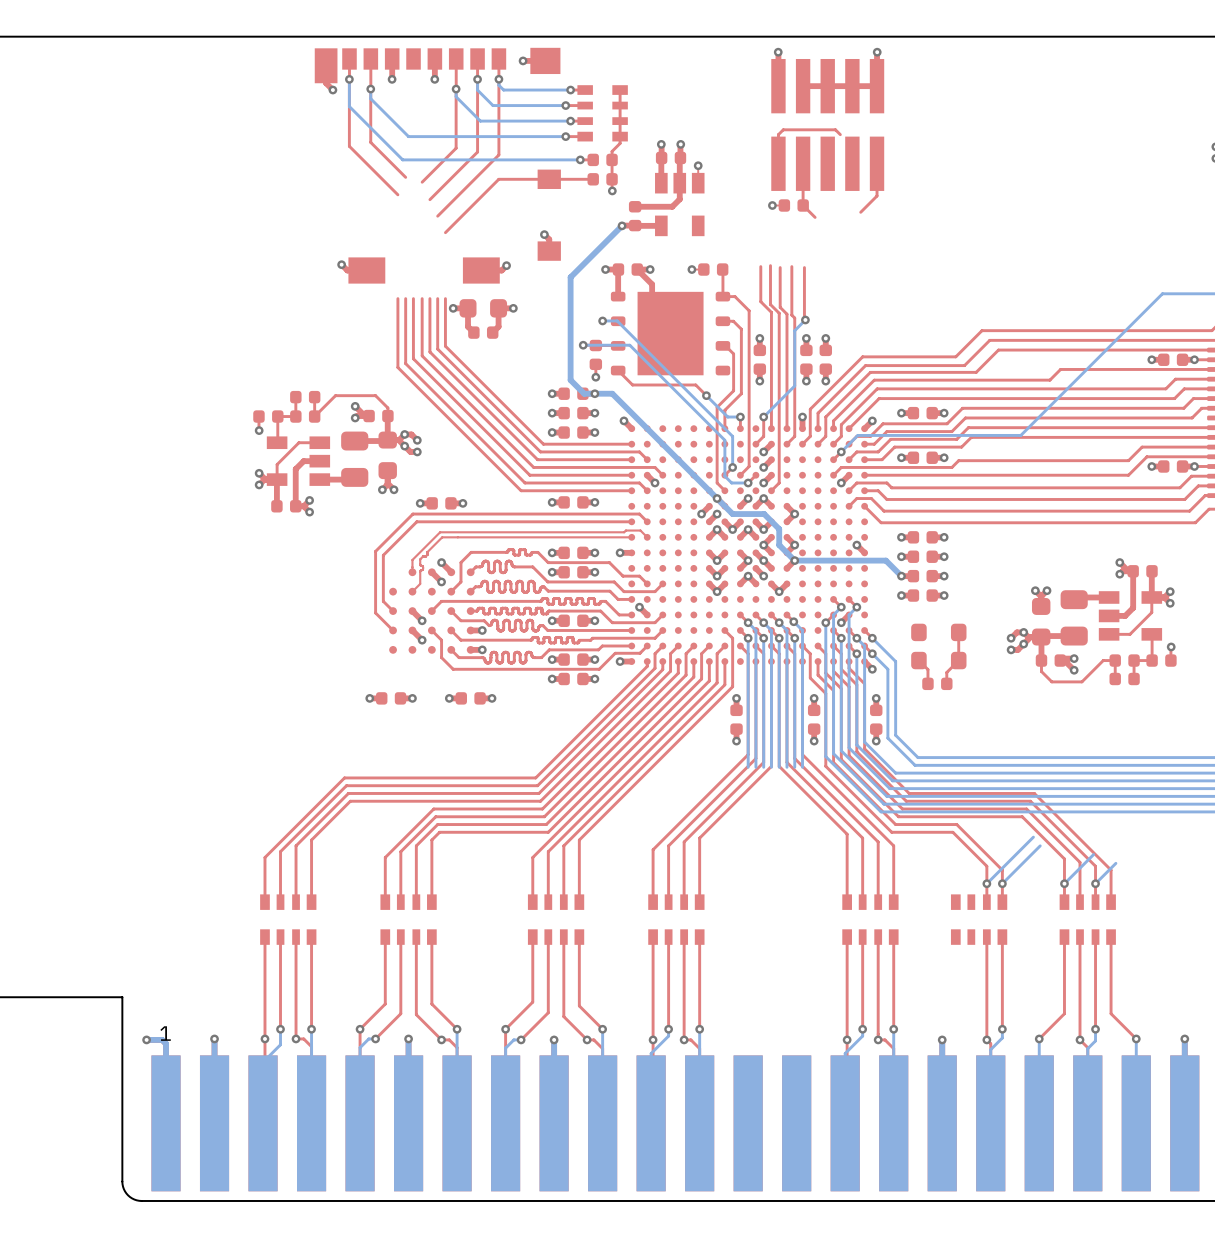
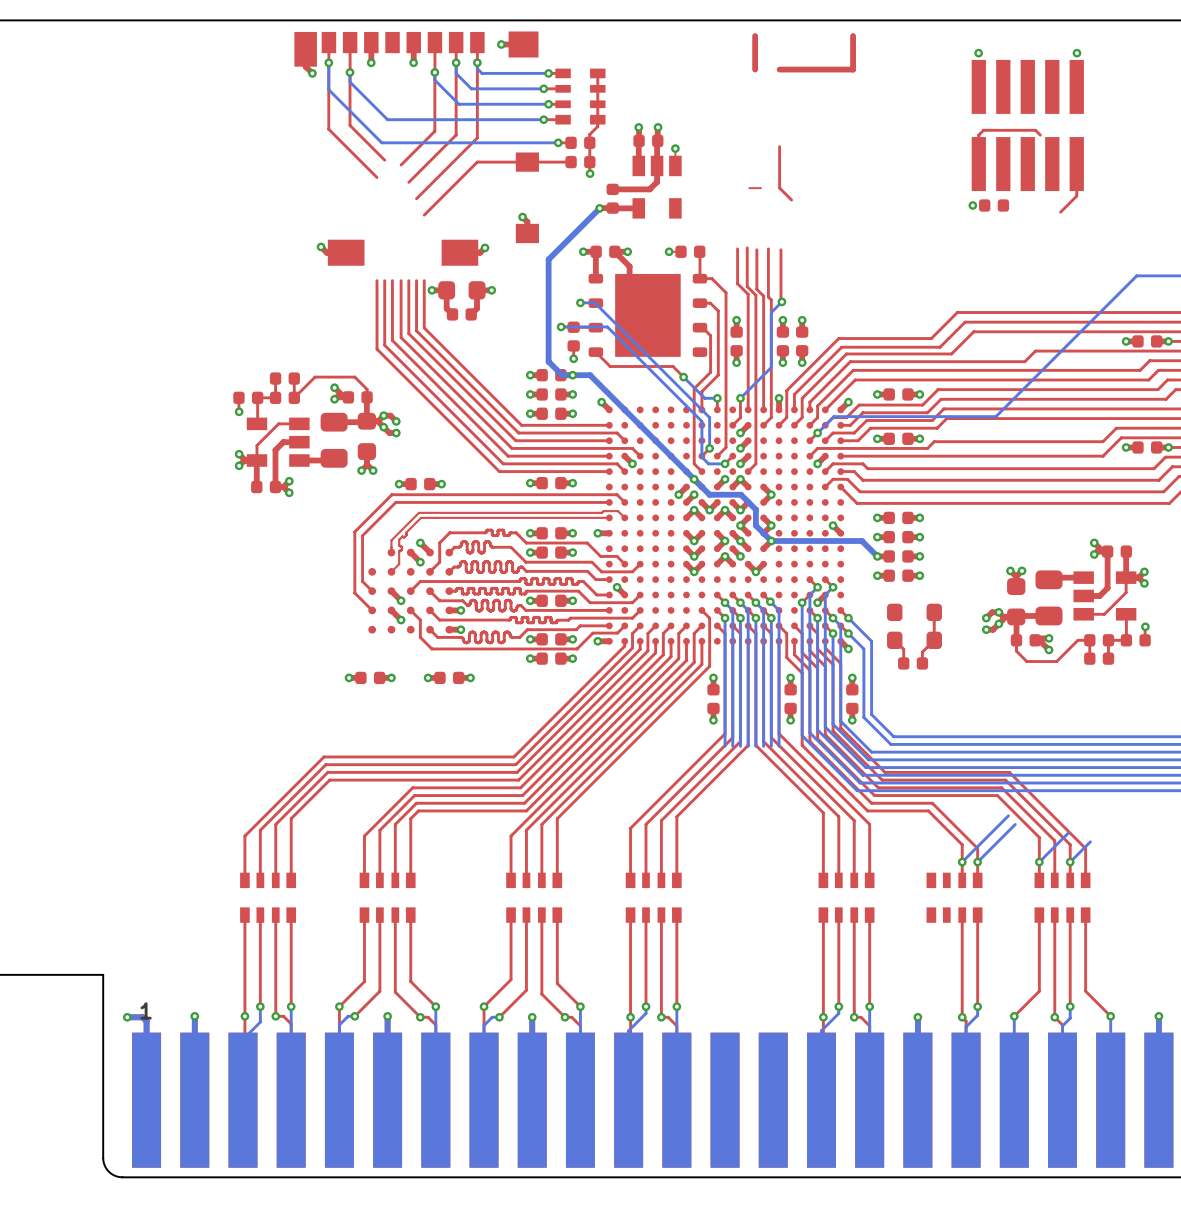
via: (778, 52) -> none
via: (877, 52) -> none
via: none -> (978, 53)
via: none -> (1076, 53)
part position: (827, 124) -> (1027, 125)
top track: (840, 134) (835, 129) (783, 129) (778, 134) (778, 163) -> (1040, 135) (1035, 130) (983, 130) (978, 135) (978, 164)
top track: (877, 163) (877, 195) (860, 212) -> (1076, 164) (1076, 196) (1060, 212)
via: (772, 205) -> none
part position: (793, 205) -> (994, 205)
via: none -> (972, 205)

